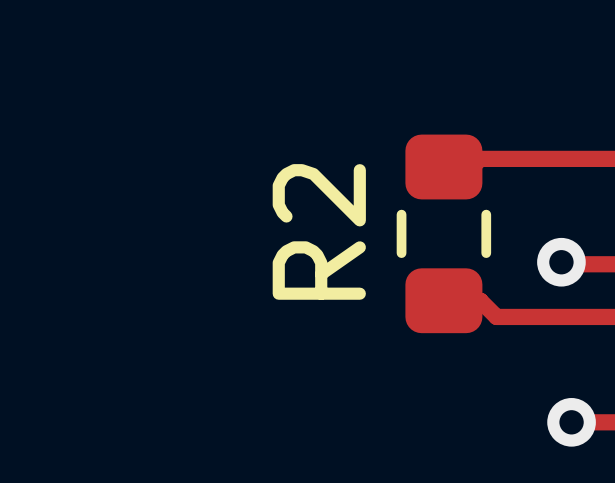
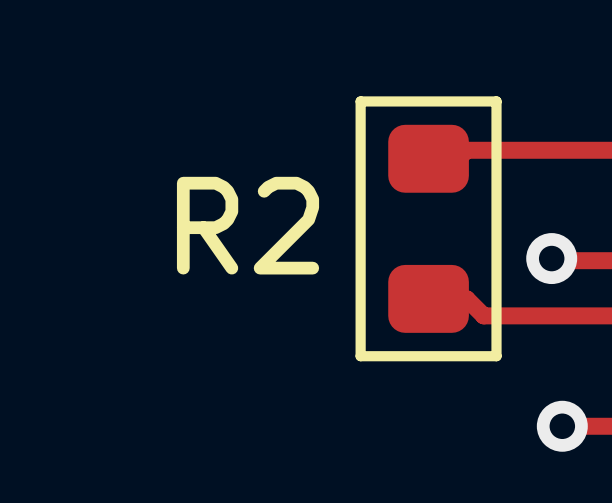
R2 footprint: [396, 134, 492, 334] -> [355, 96, 502, 362]

